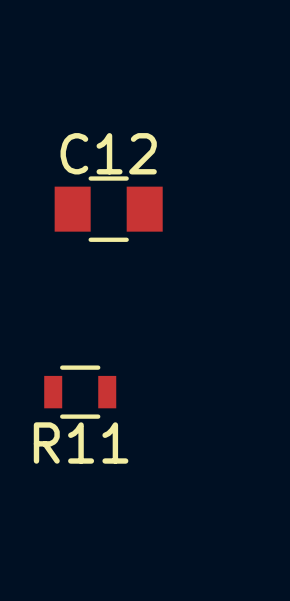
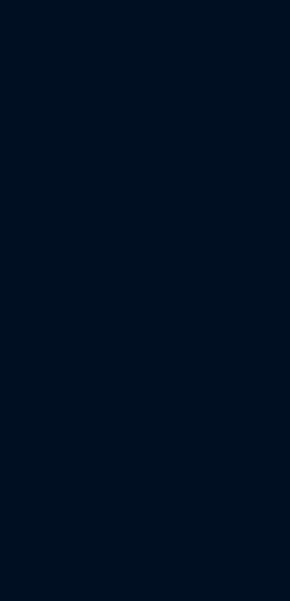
C12: (108, 209) -> none
R11: (80, 392) -> none

